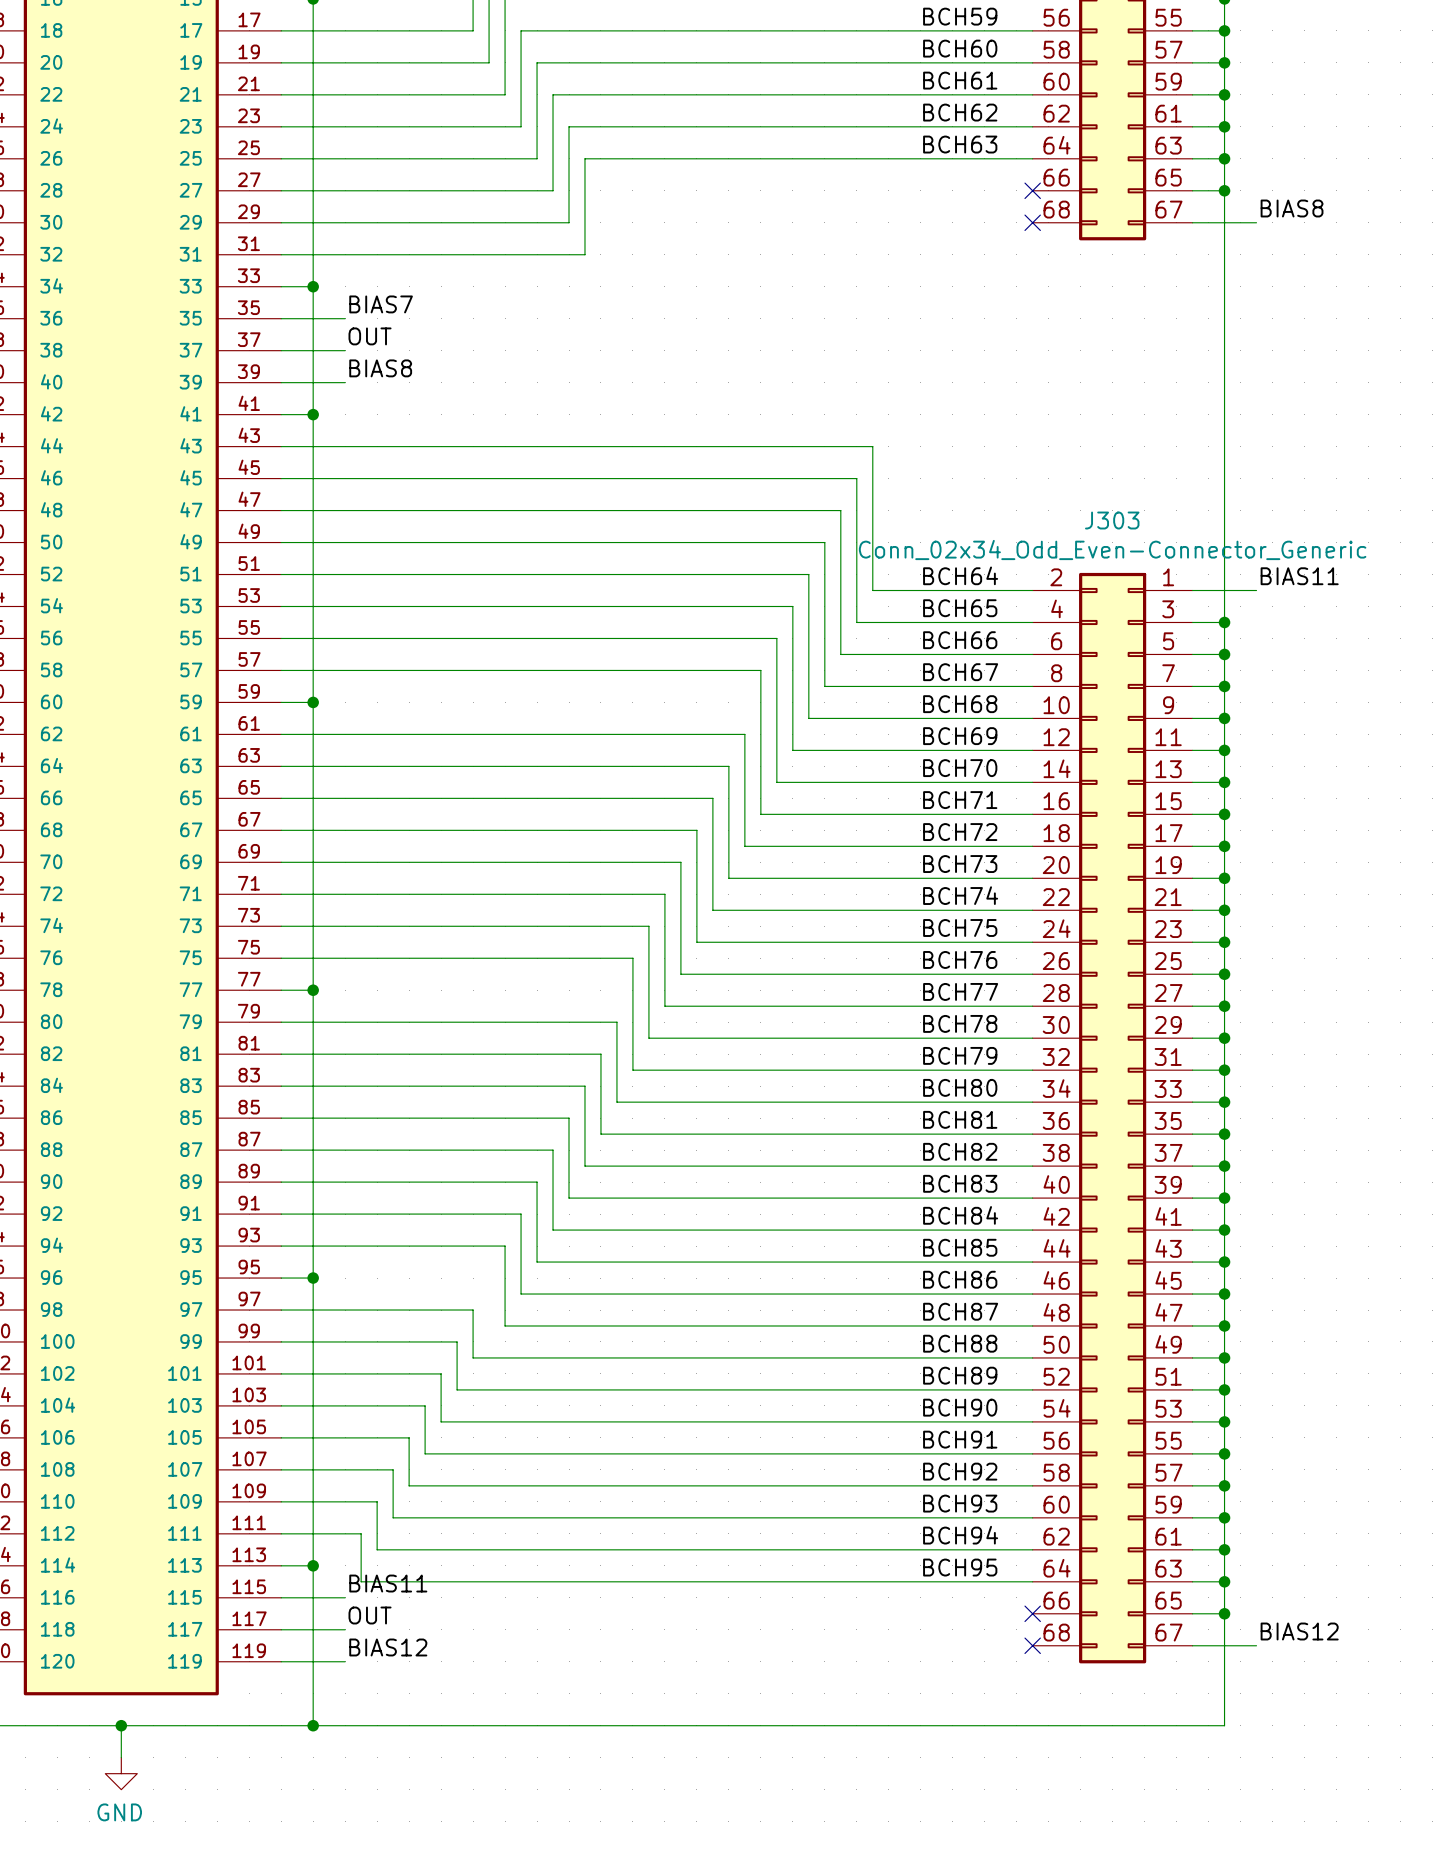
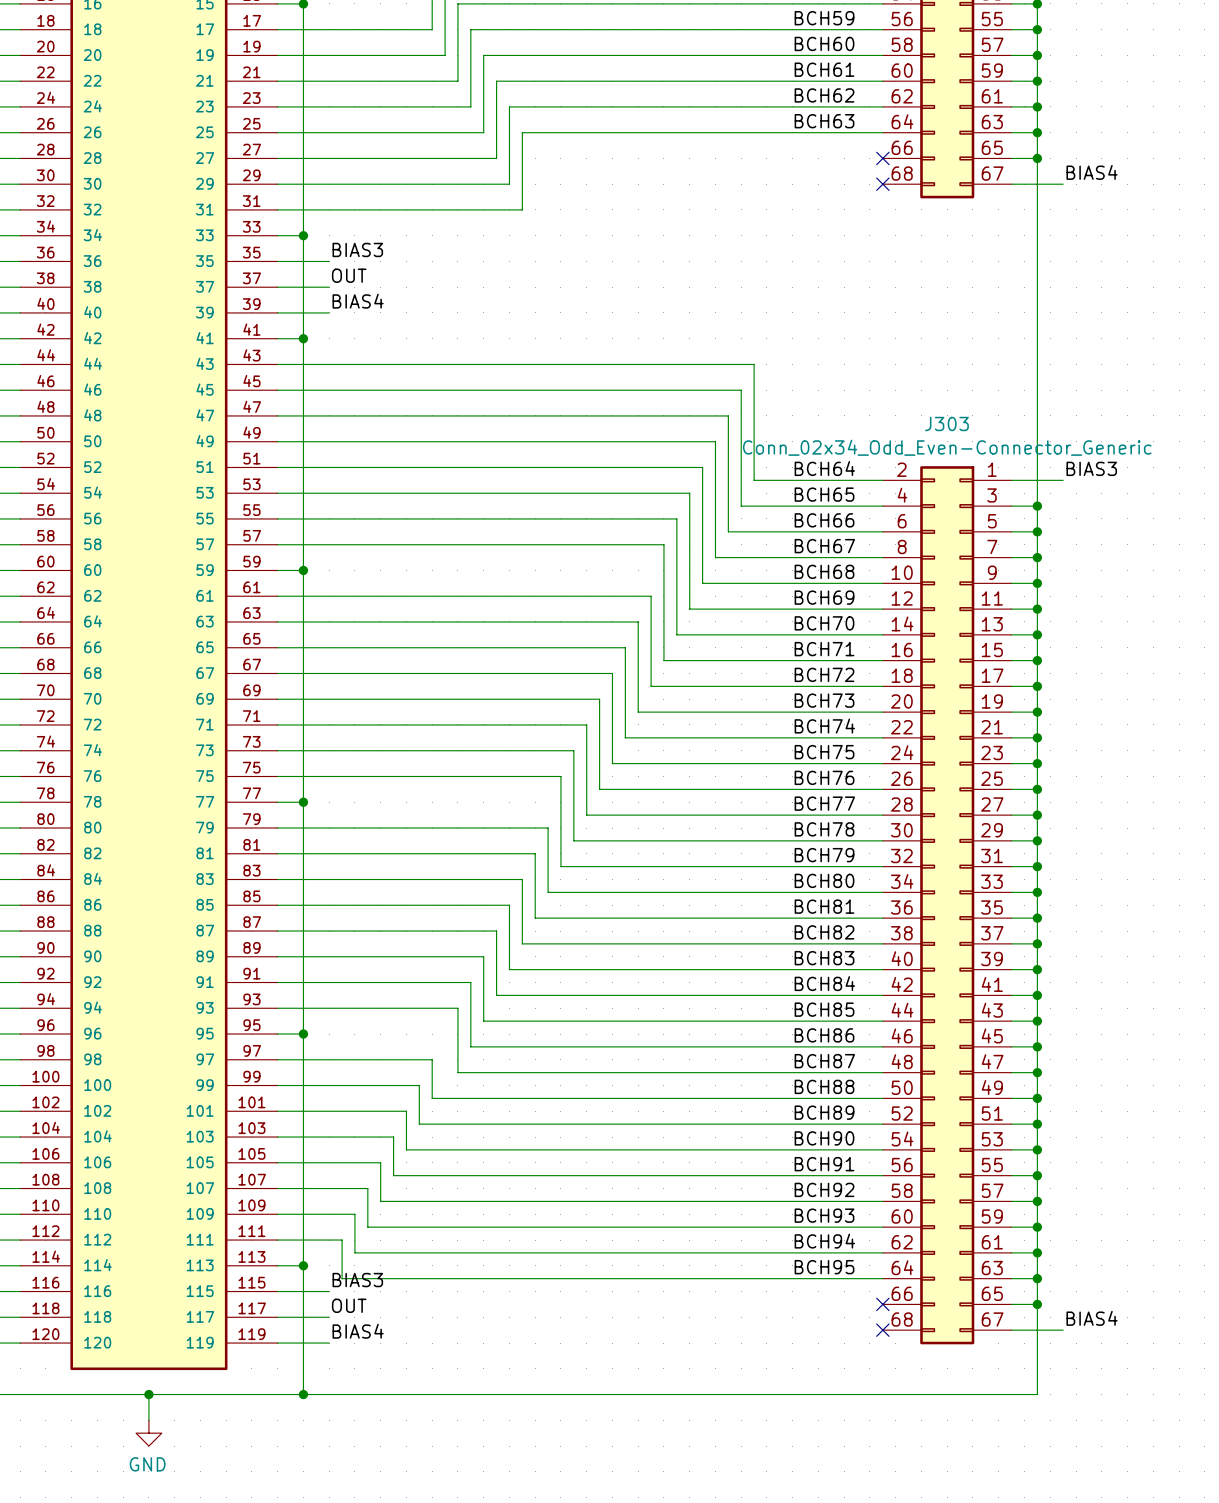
label: BIAS8 (1292, 208) -> BIAS4 (1092, 172)
label: BIAS7 (381, 304) -> BIAS3 (357, 249)
label: BIAS8 (380, 368) -> BIAS4 (358, 301)
label: BIAS11 (1299, 576) -> BIAS3 (1091, 468)
label: BIAS11 (388, 1583) -> BIAS3 (357, 1280)
label: BIAS12 (1299, 1631) -> BIAS4 (1092, 1318)
label: BIAS12 (388, 1647) -> BIAS4 (358, 1331)

